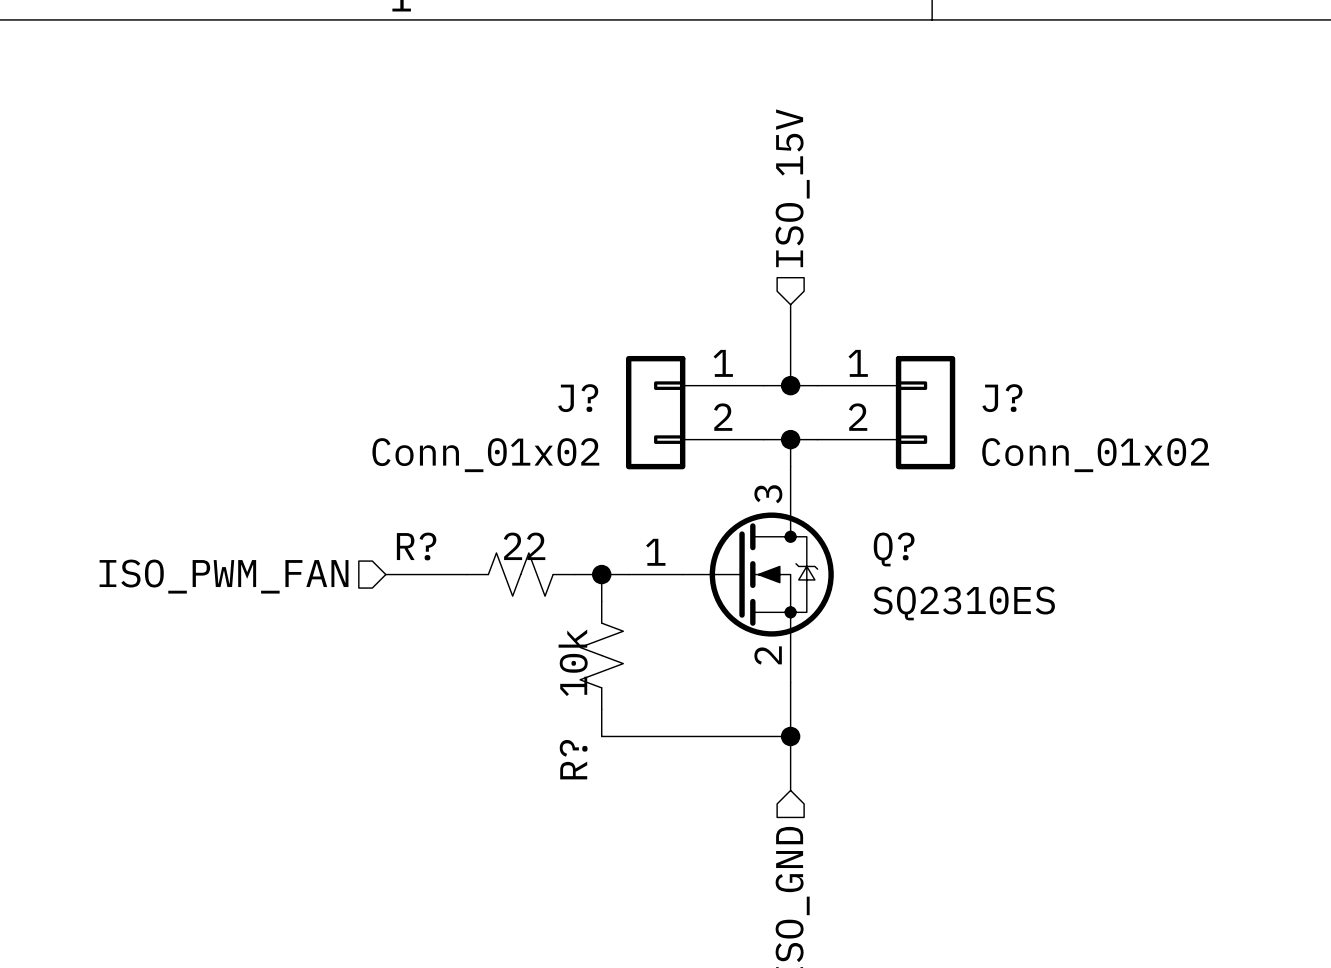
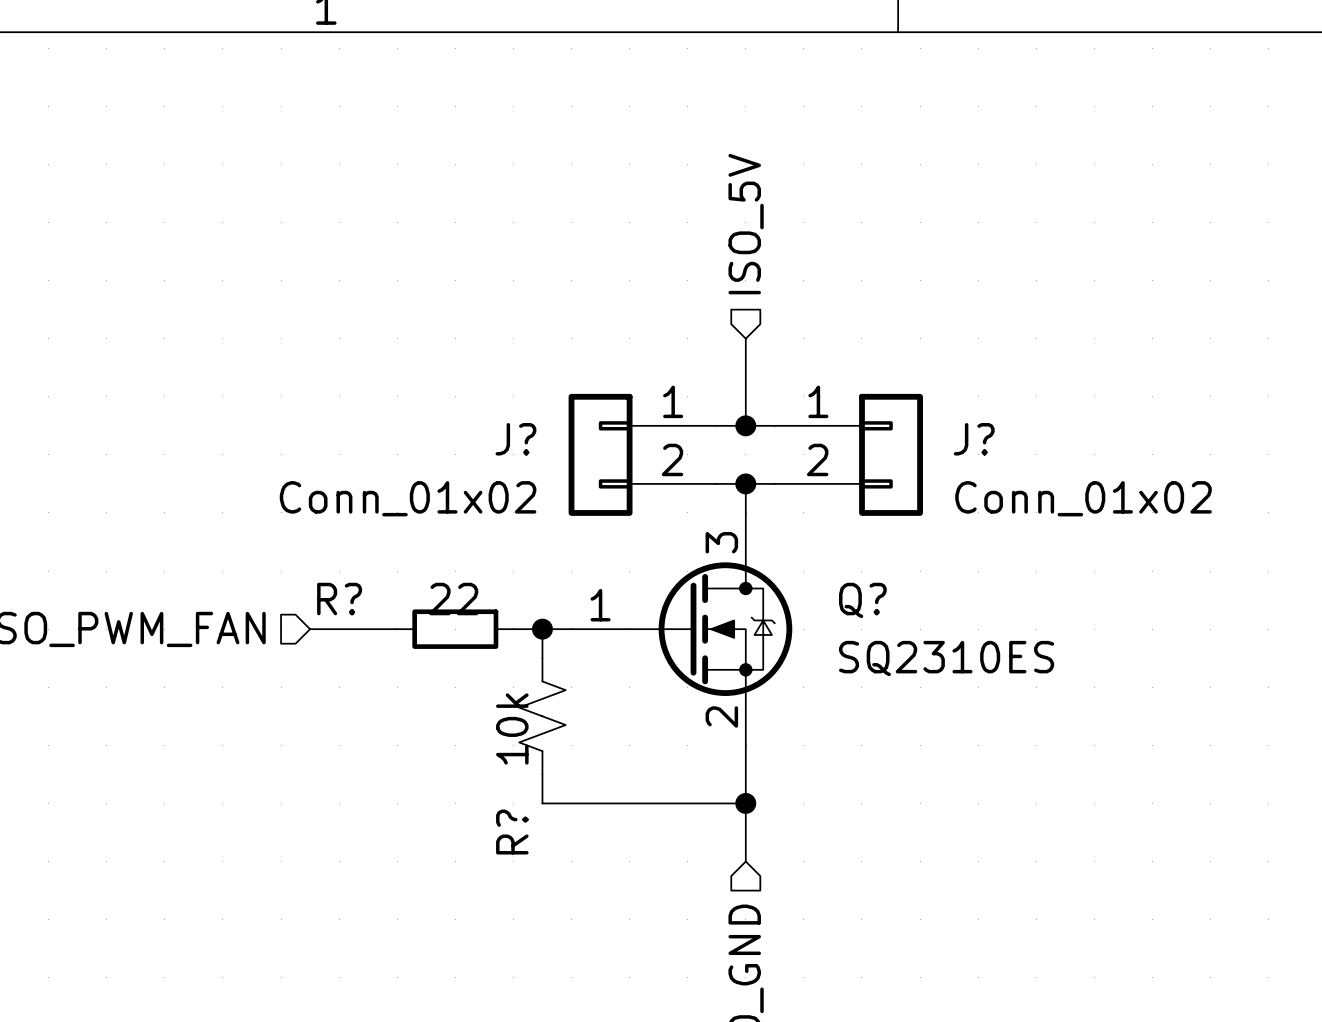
hierarchical label: ISO_15V (792, 188) -> ISO_5V (746, 224)
R? symbol: [466, 552, 575, 597] -> [397, 609, 514, 649]

